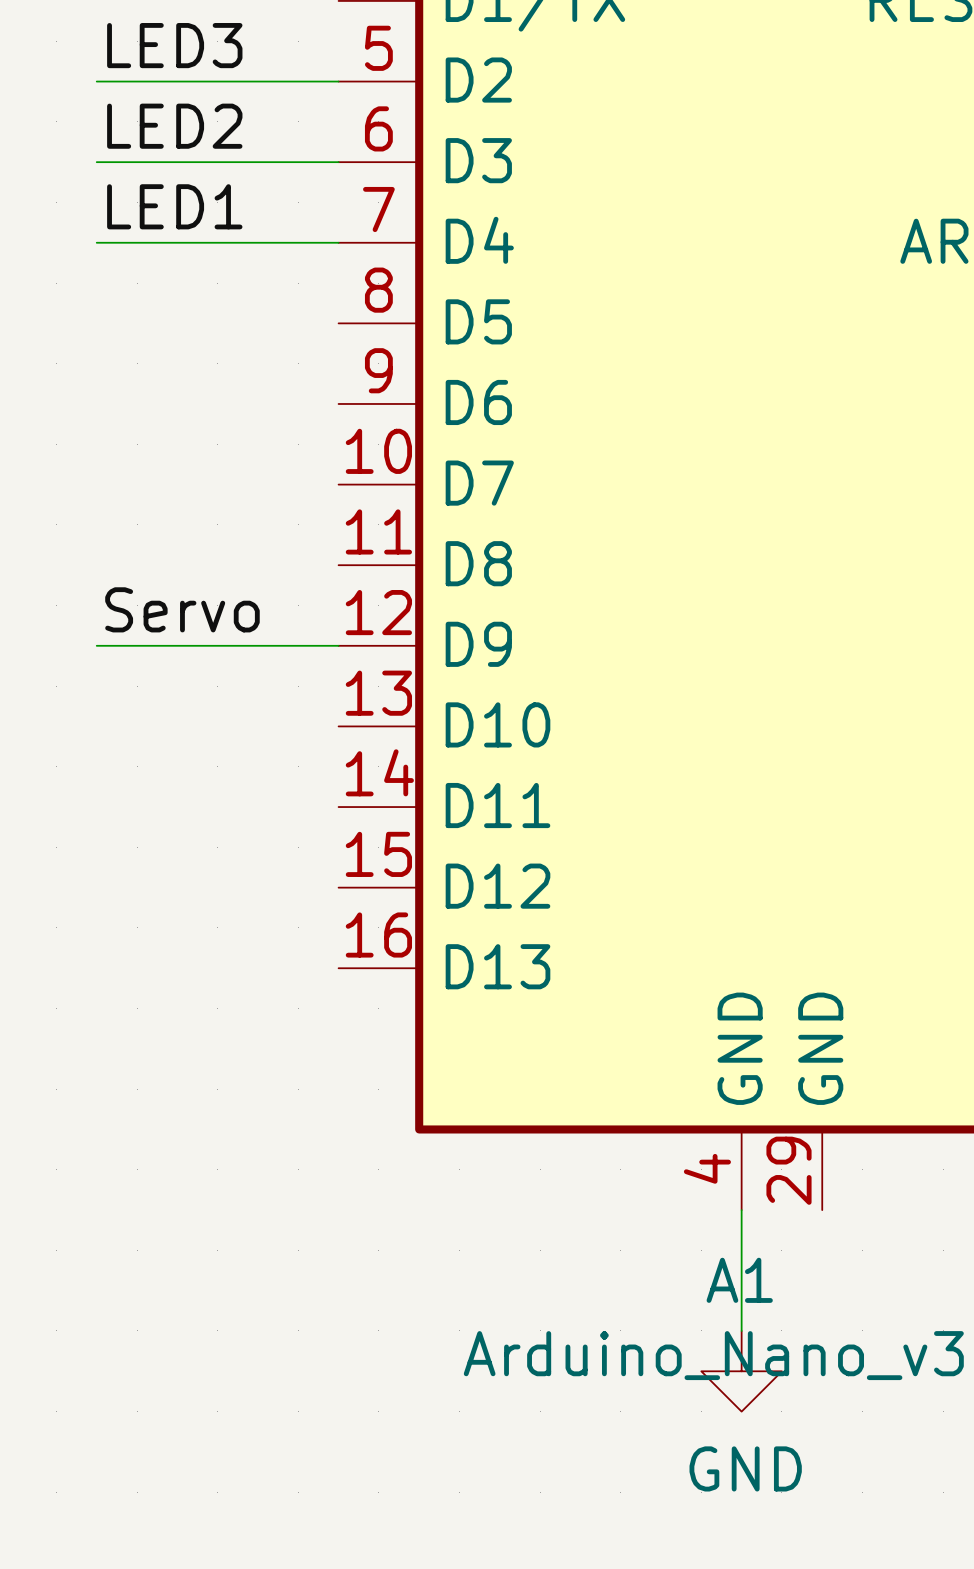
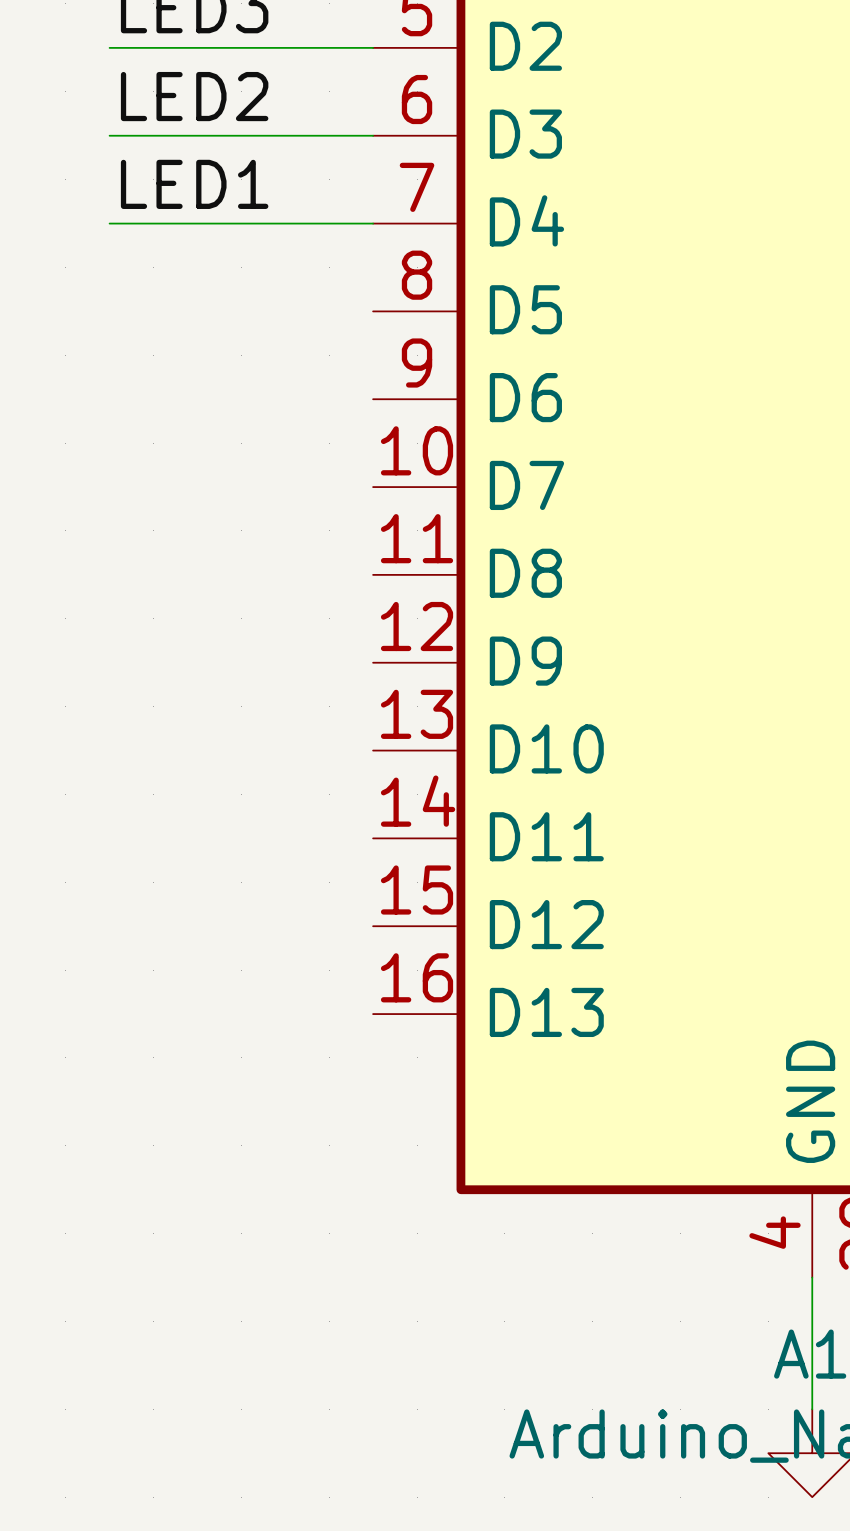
label: Servo (182, 609) -> none
wire: (96, 645) (338, 645) -> none

